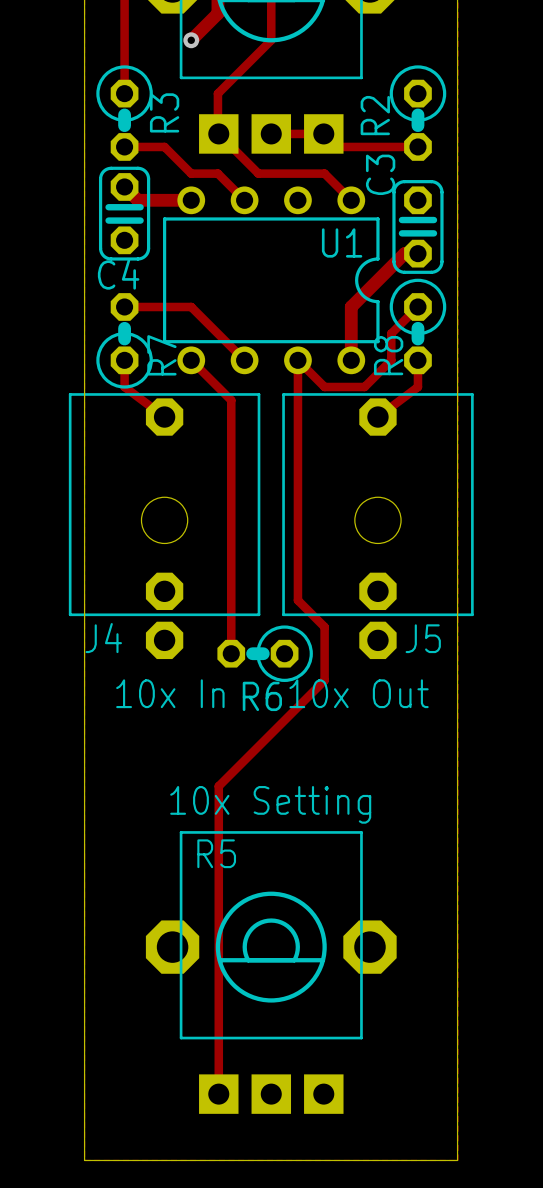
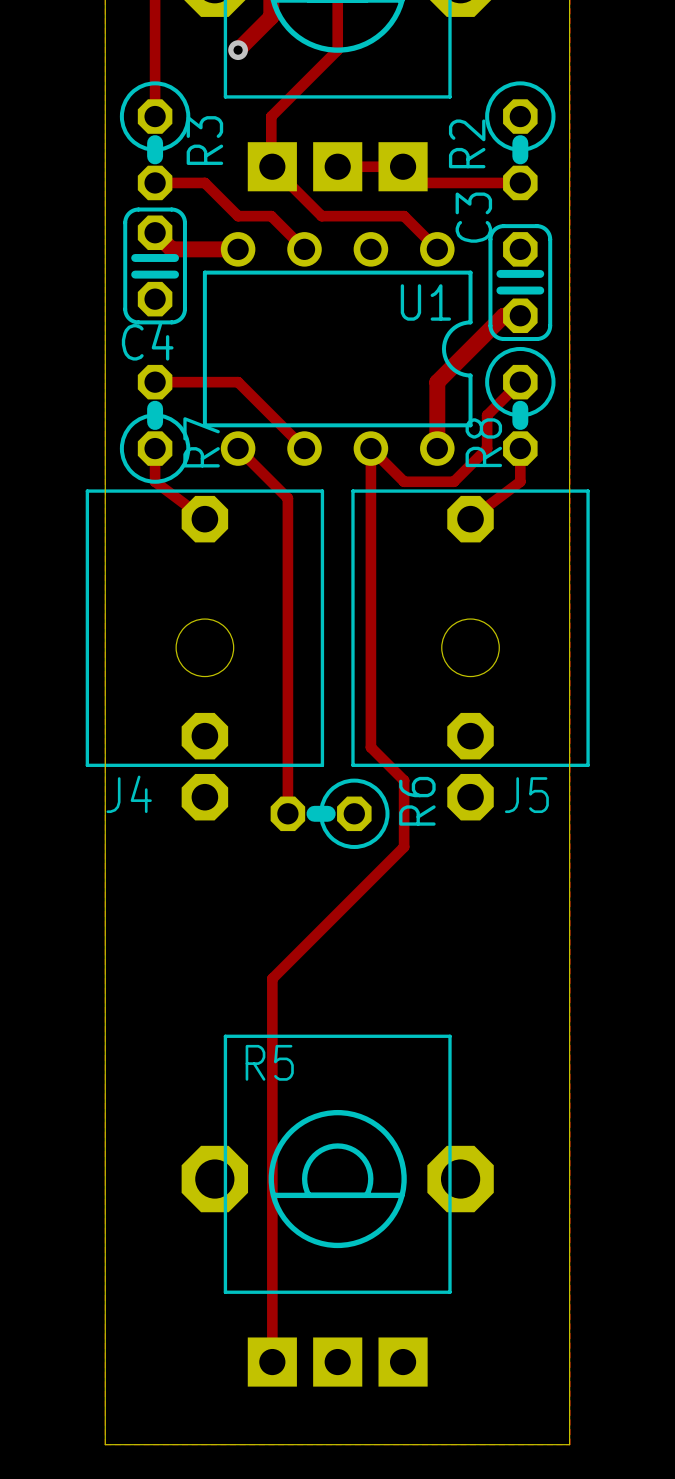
text: 10x In (170, 693) -> none
text: 10x Out (359, 693) -> none
R6 name rotation: 0° (262, 696) -> 90° counterclockwise (417, 801)
R6 name position: R6 (262, 696) -> R6 (417, 801)
text: 10x Setting (270, 804) -> none

